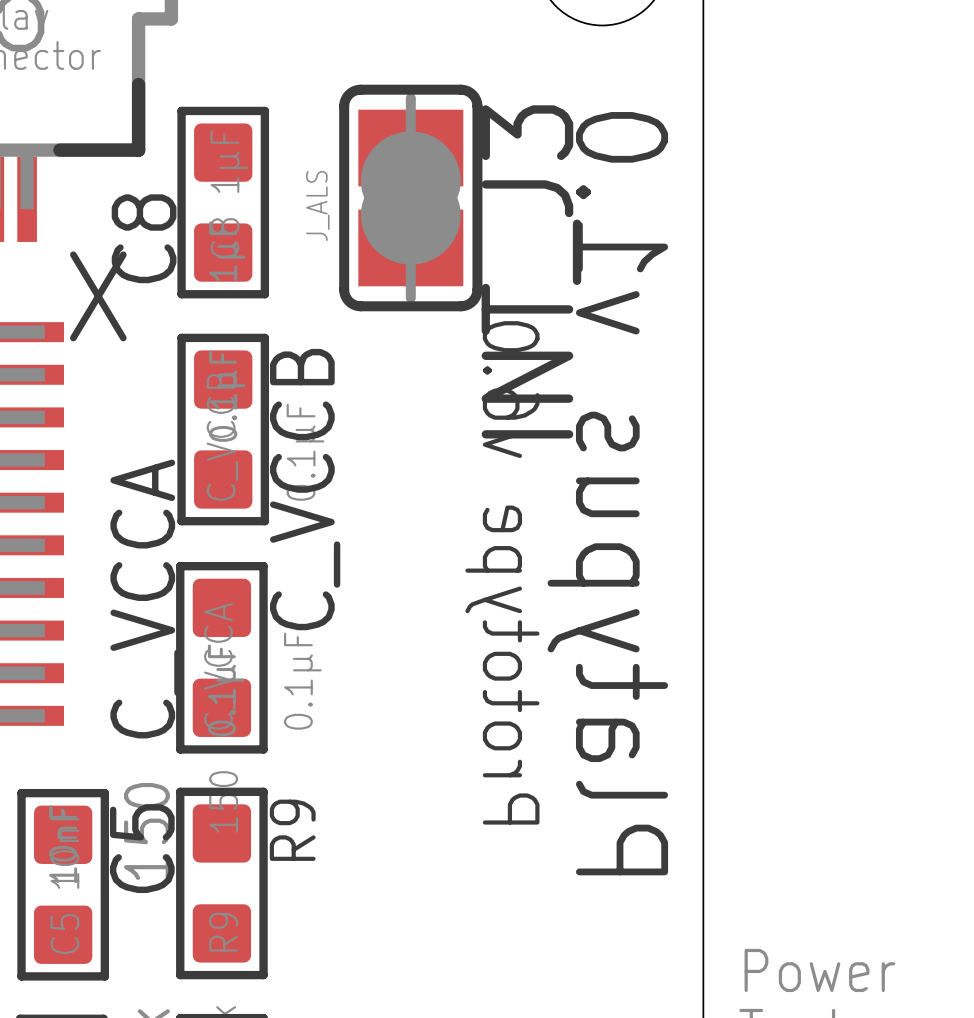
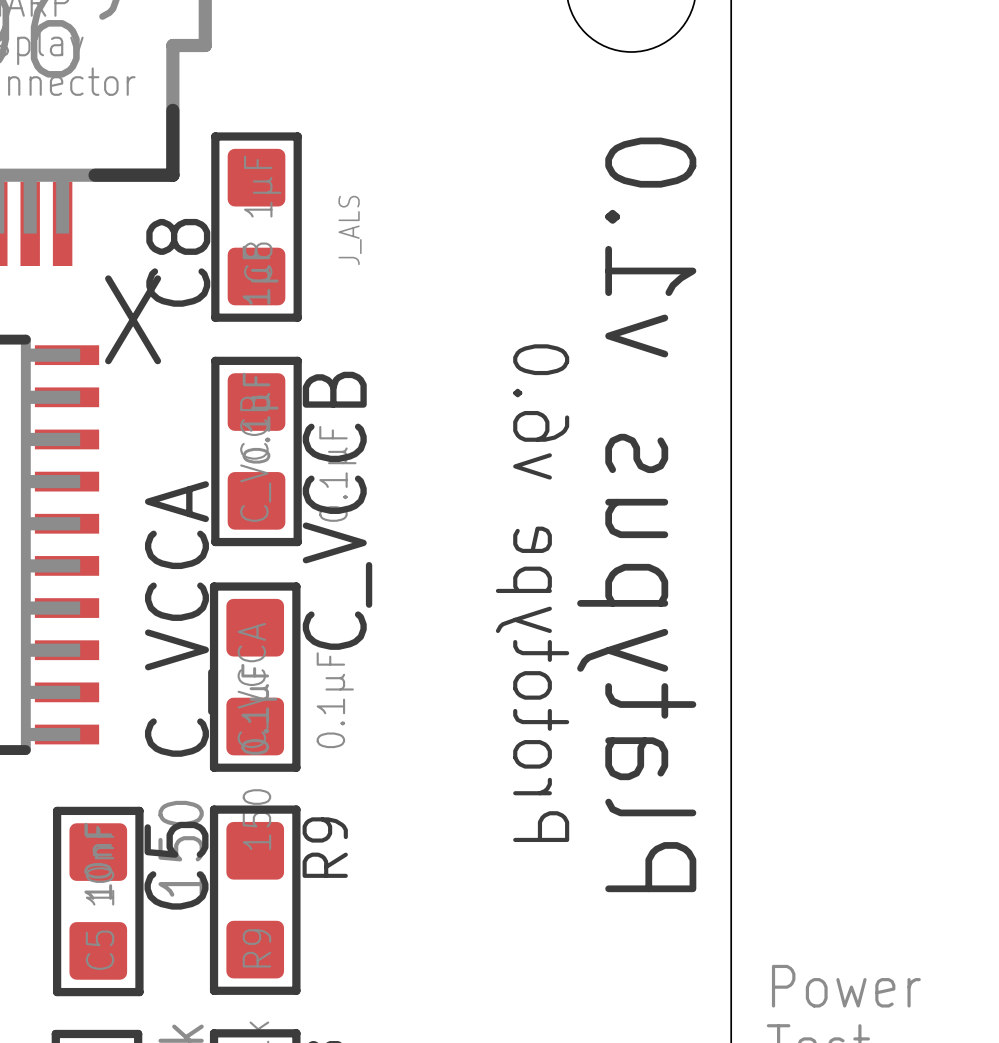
INT_J3: (410, 197) -> none

